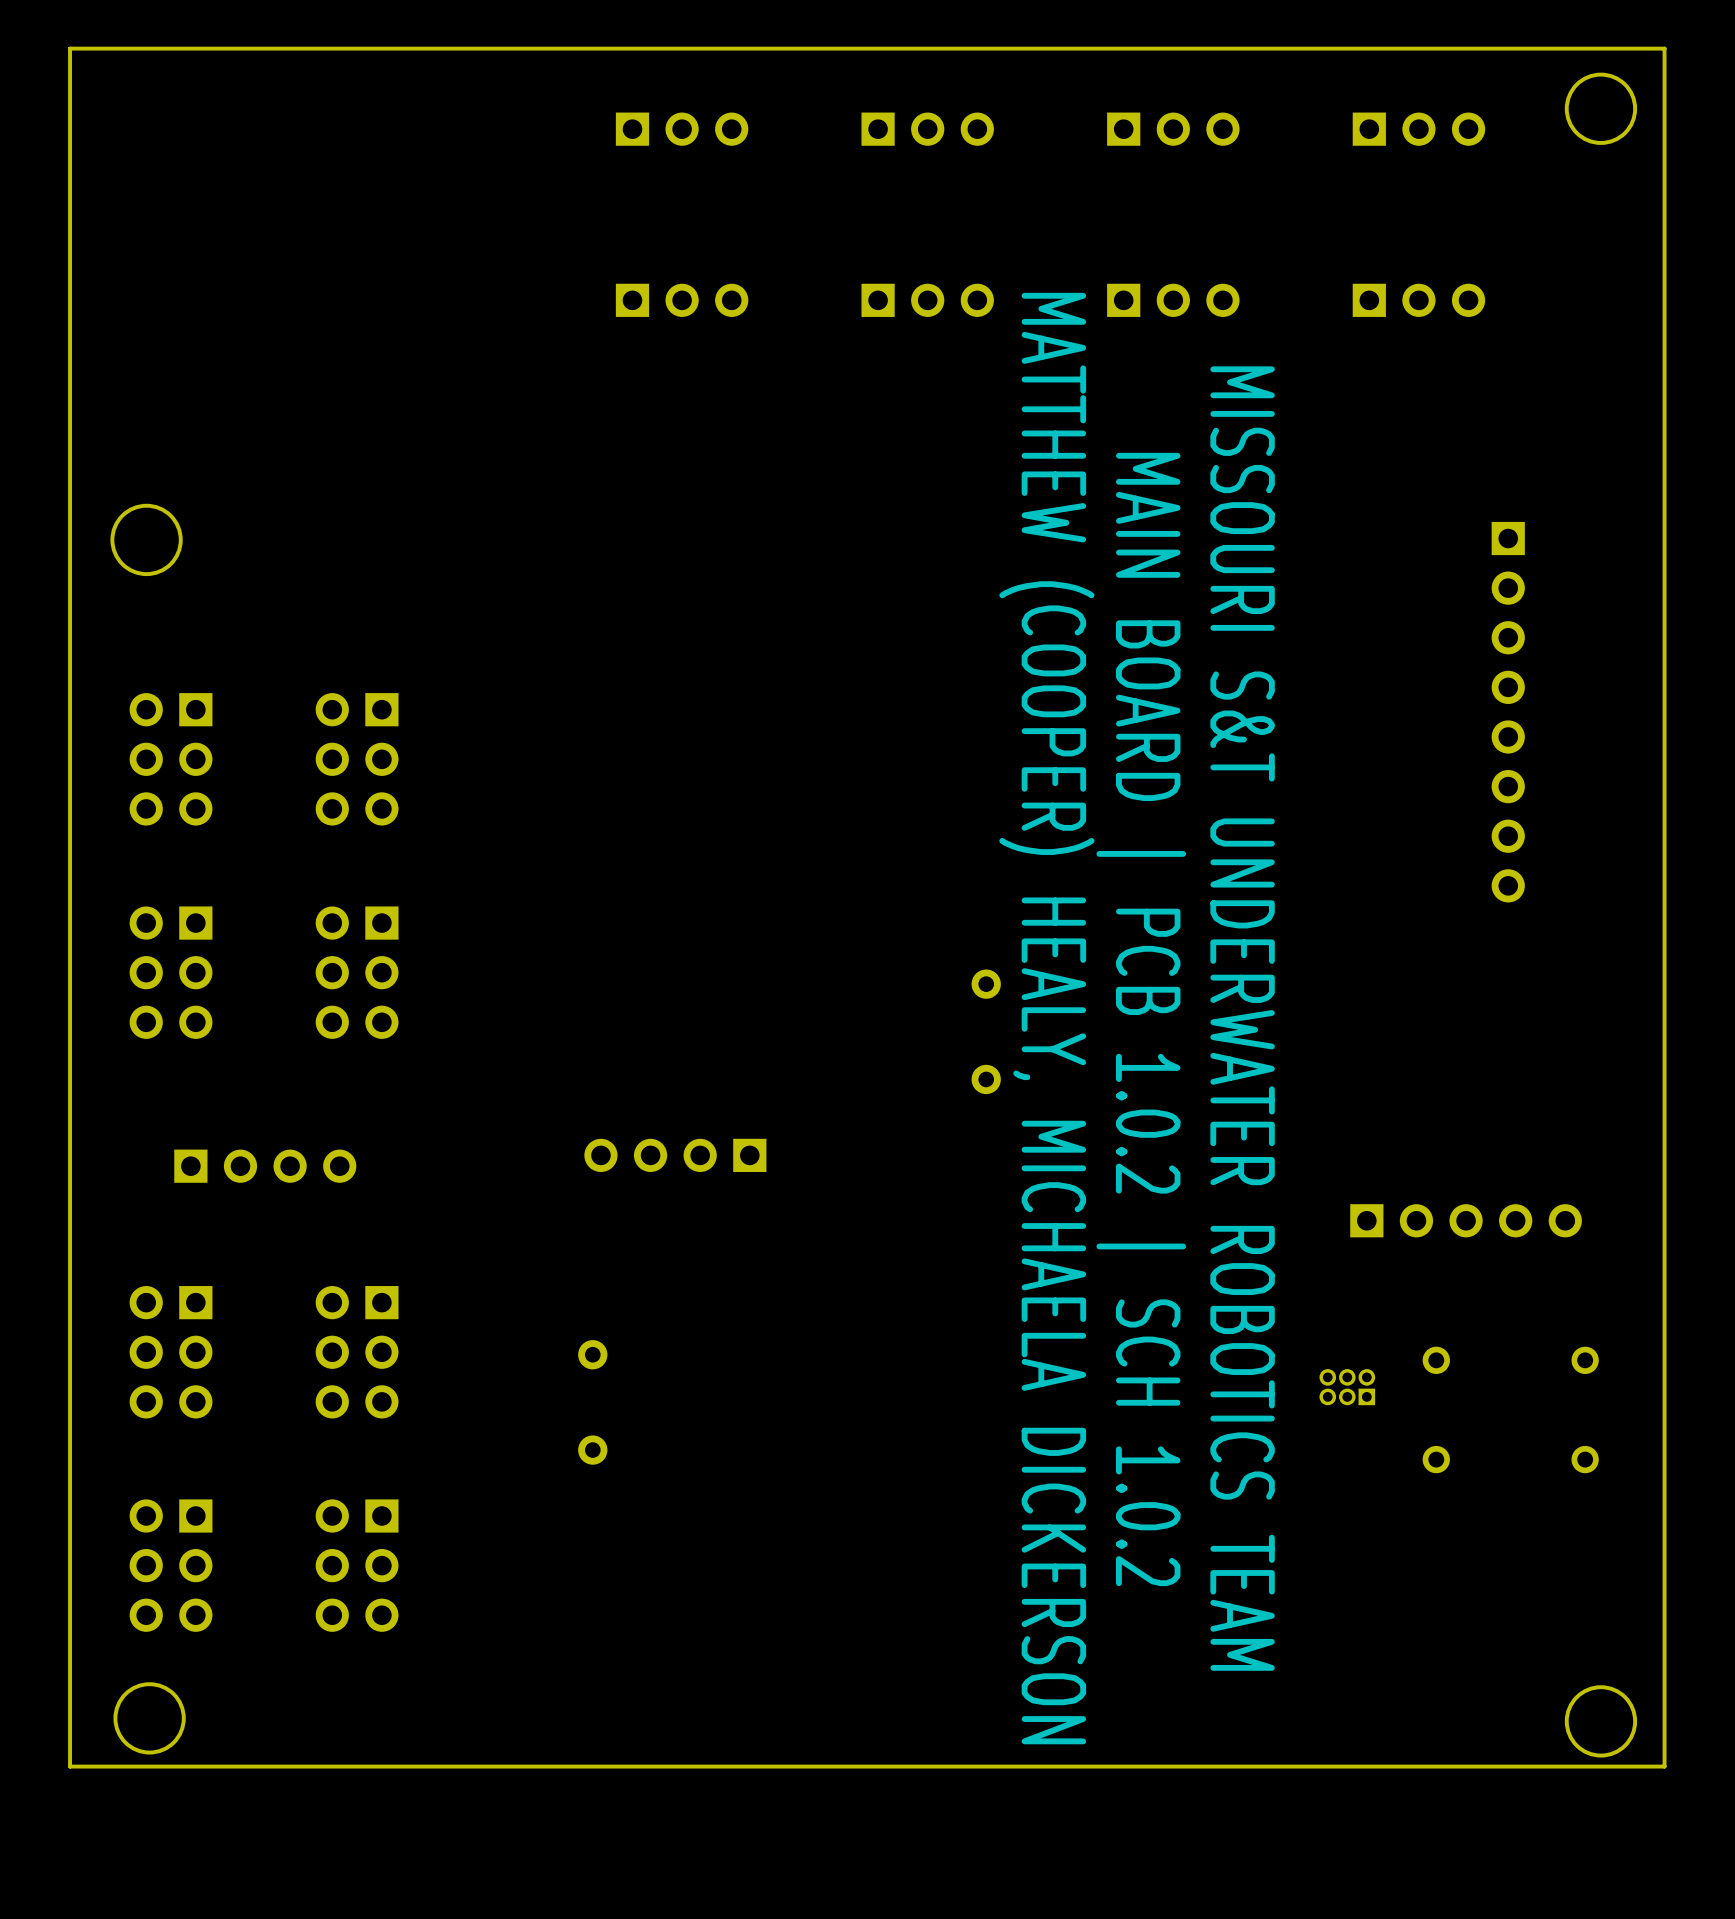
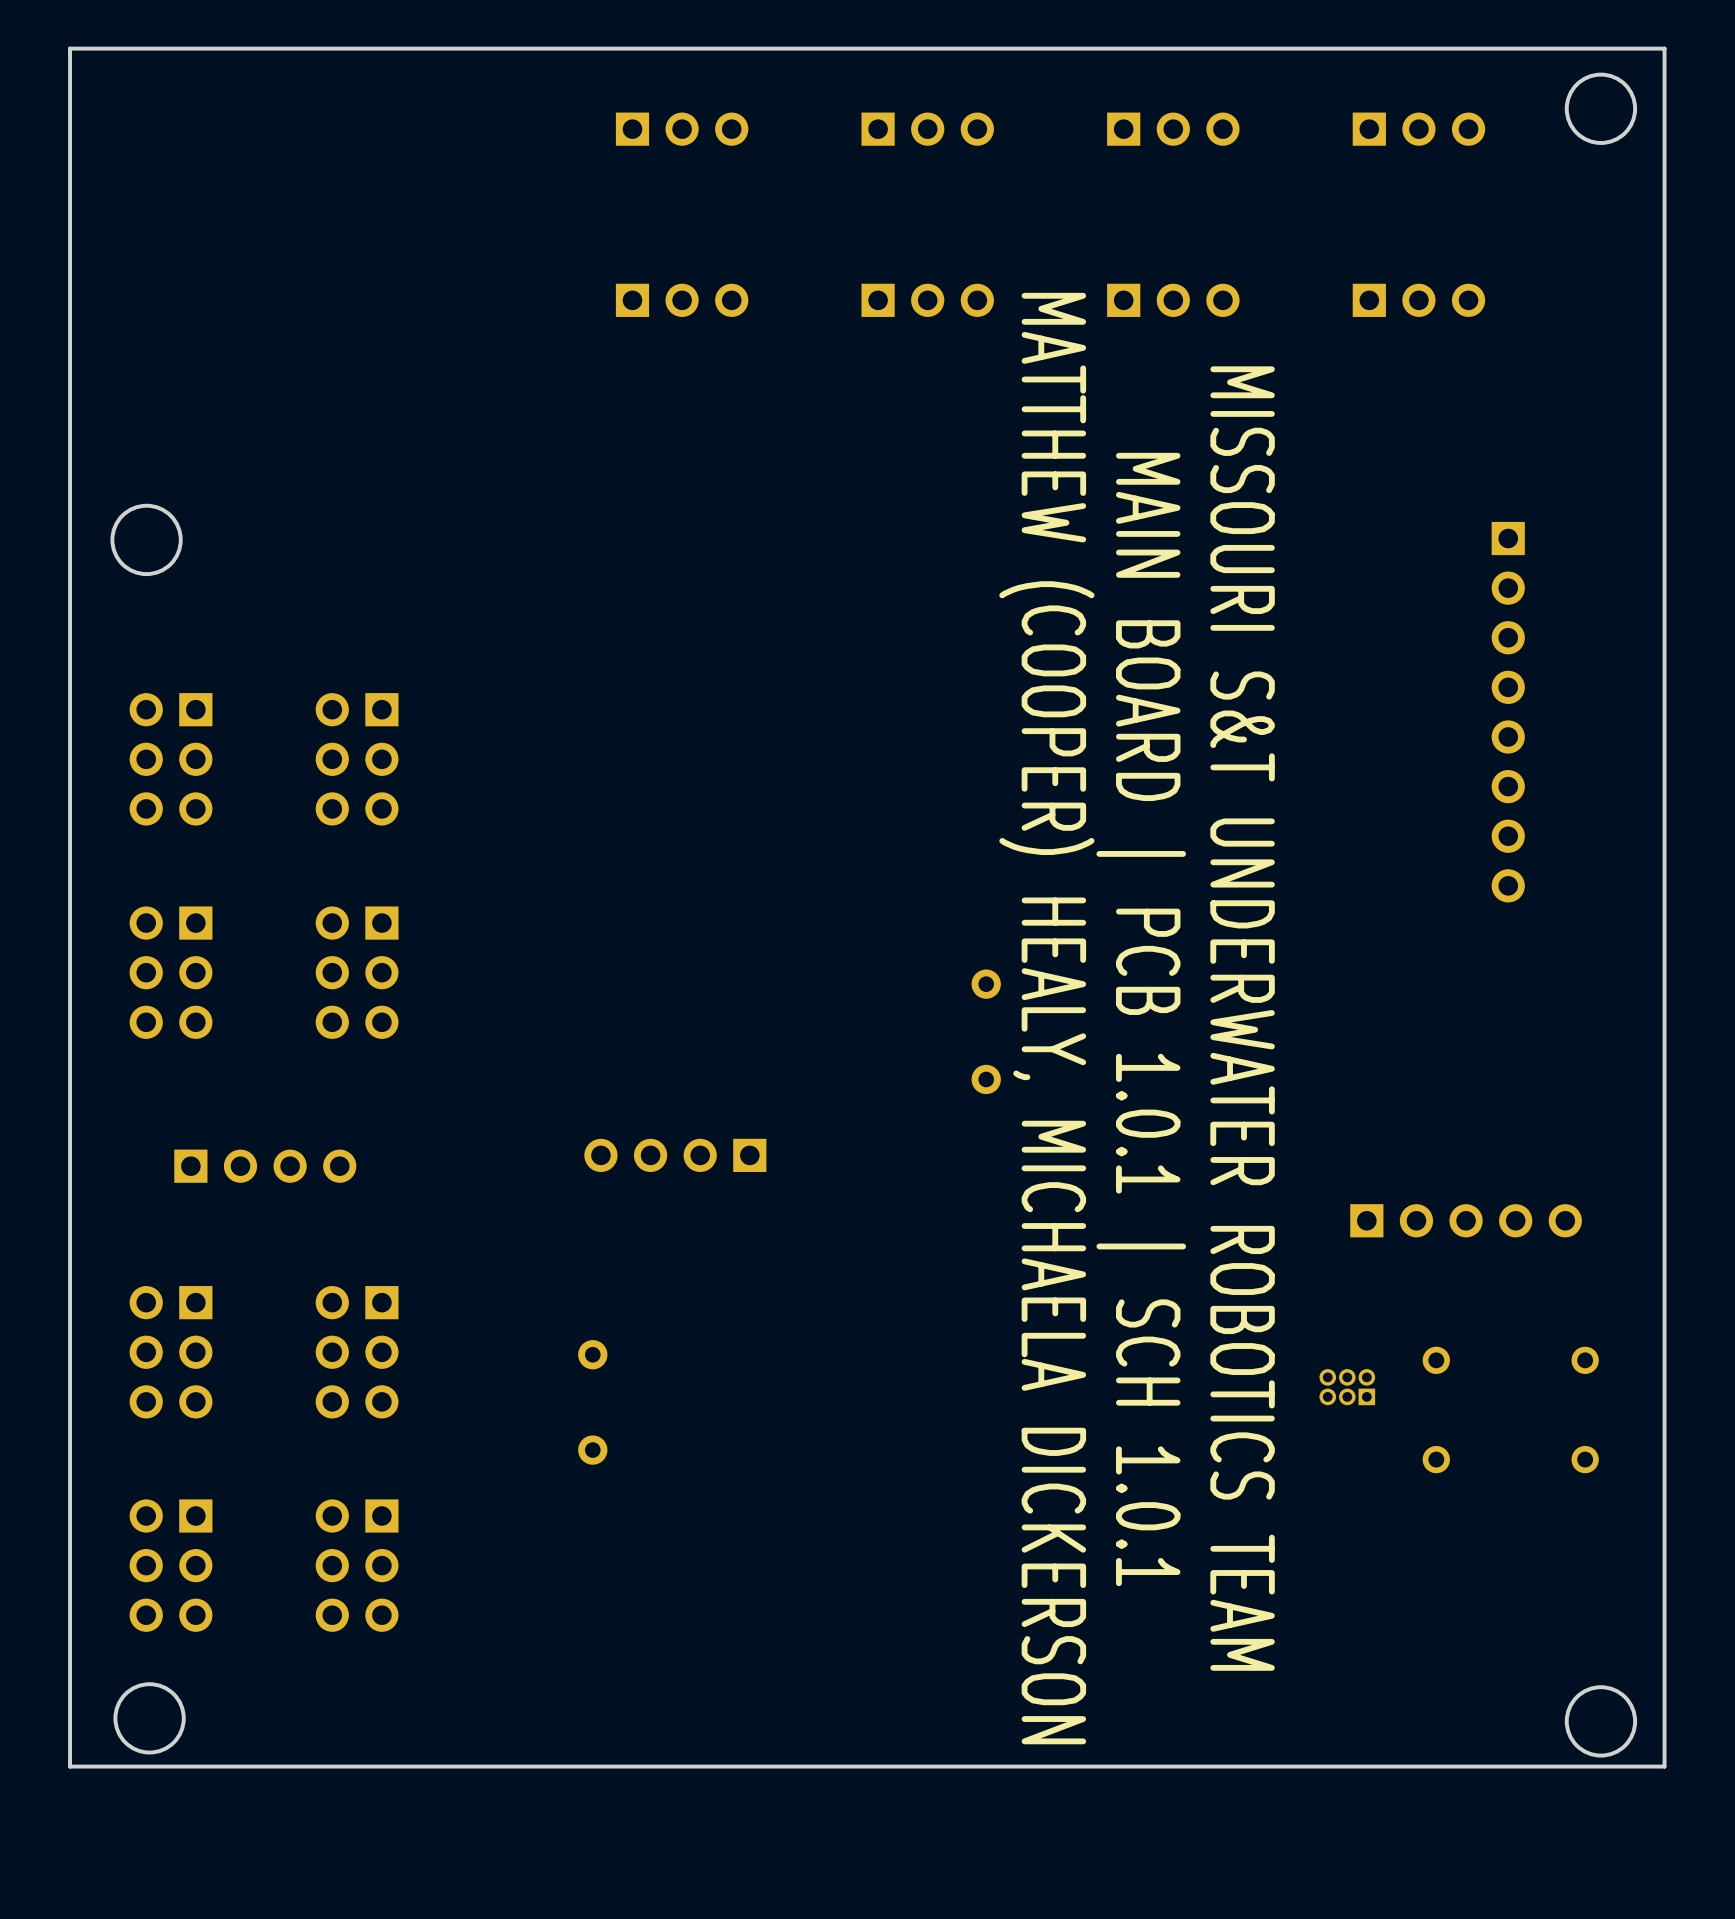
text: MAIN BOARD | PCB 1.0.2 | SCH 1.0.2 (1141, 1019) -> MAIN BOARD | PCB 1.0.1 | SCH 1.0.1 (1141, 1019)

